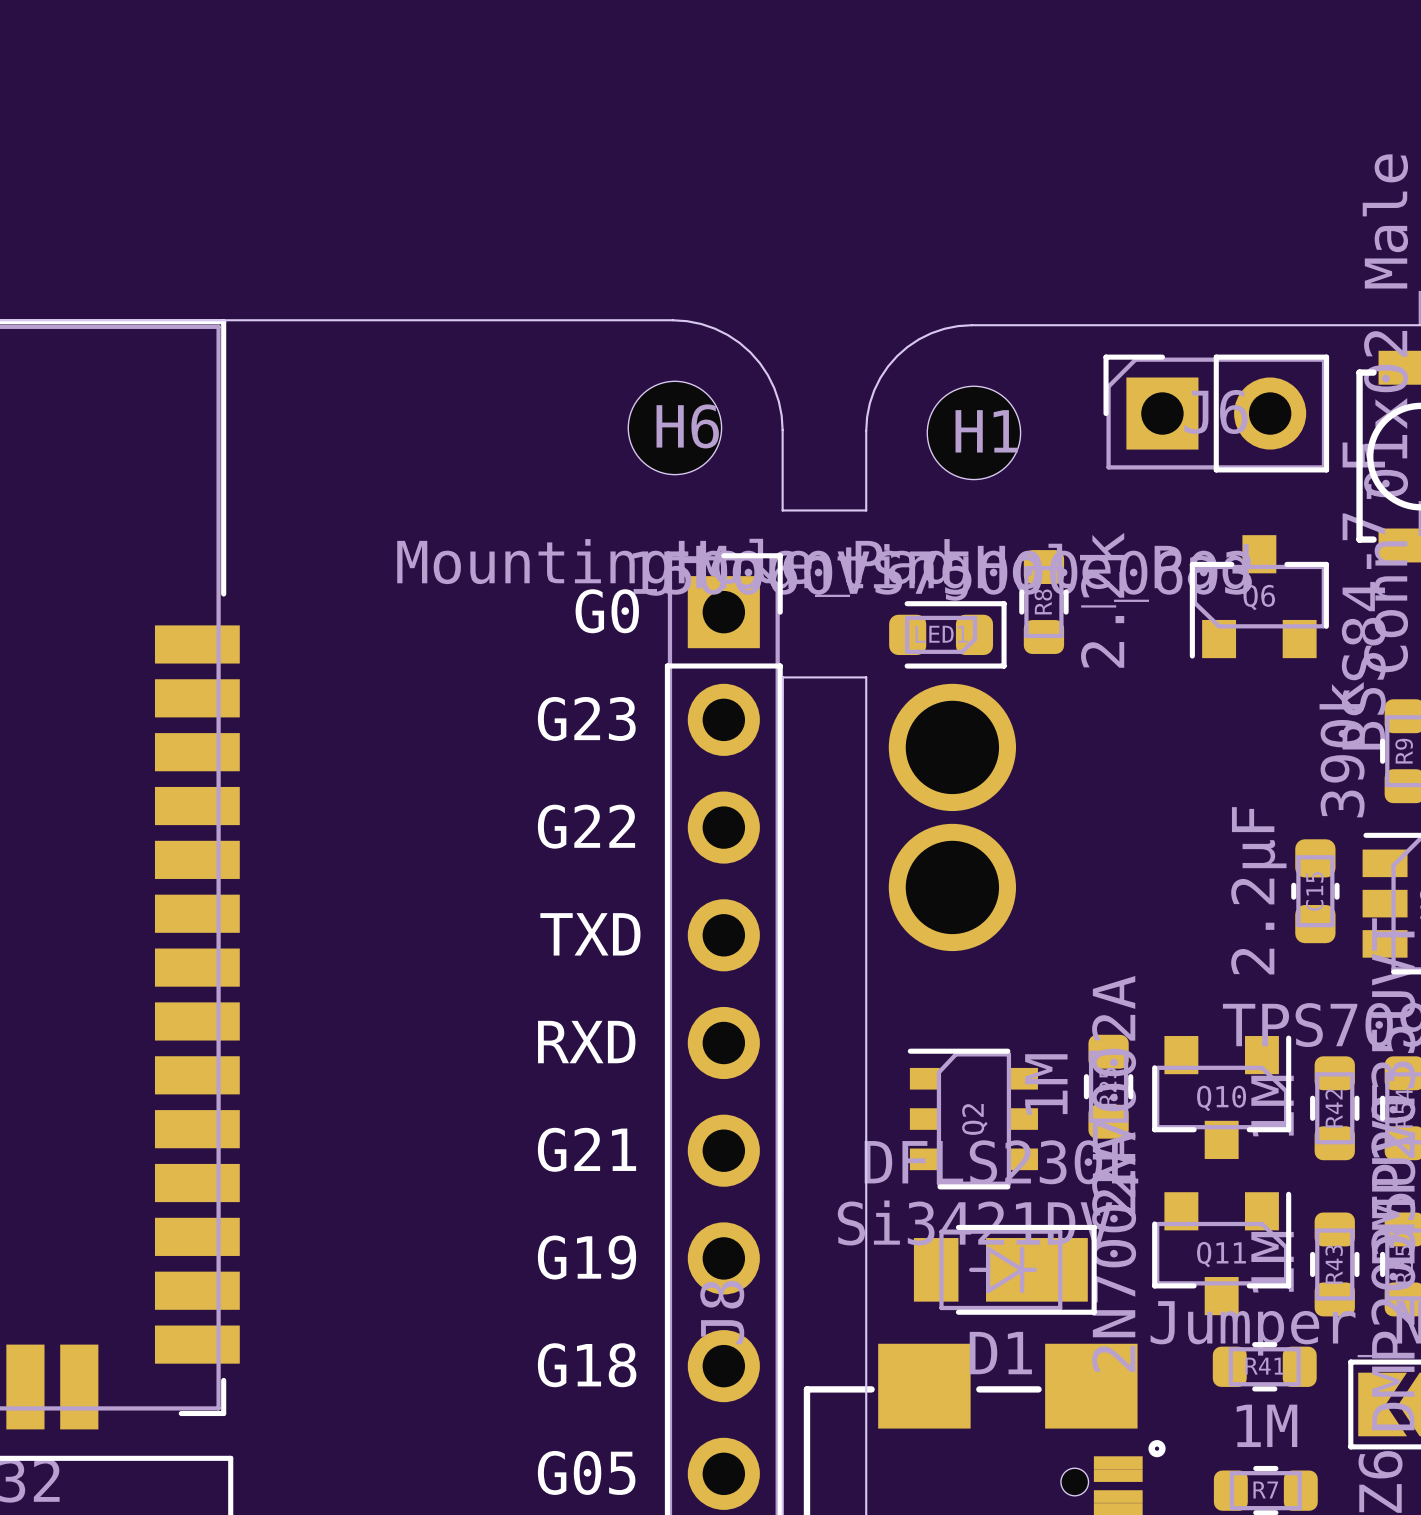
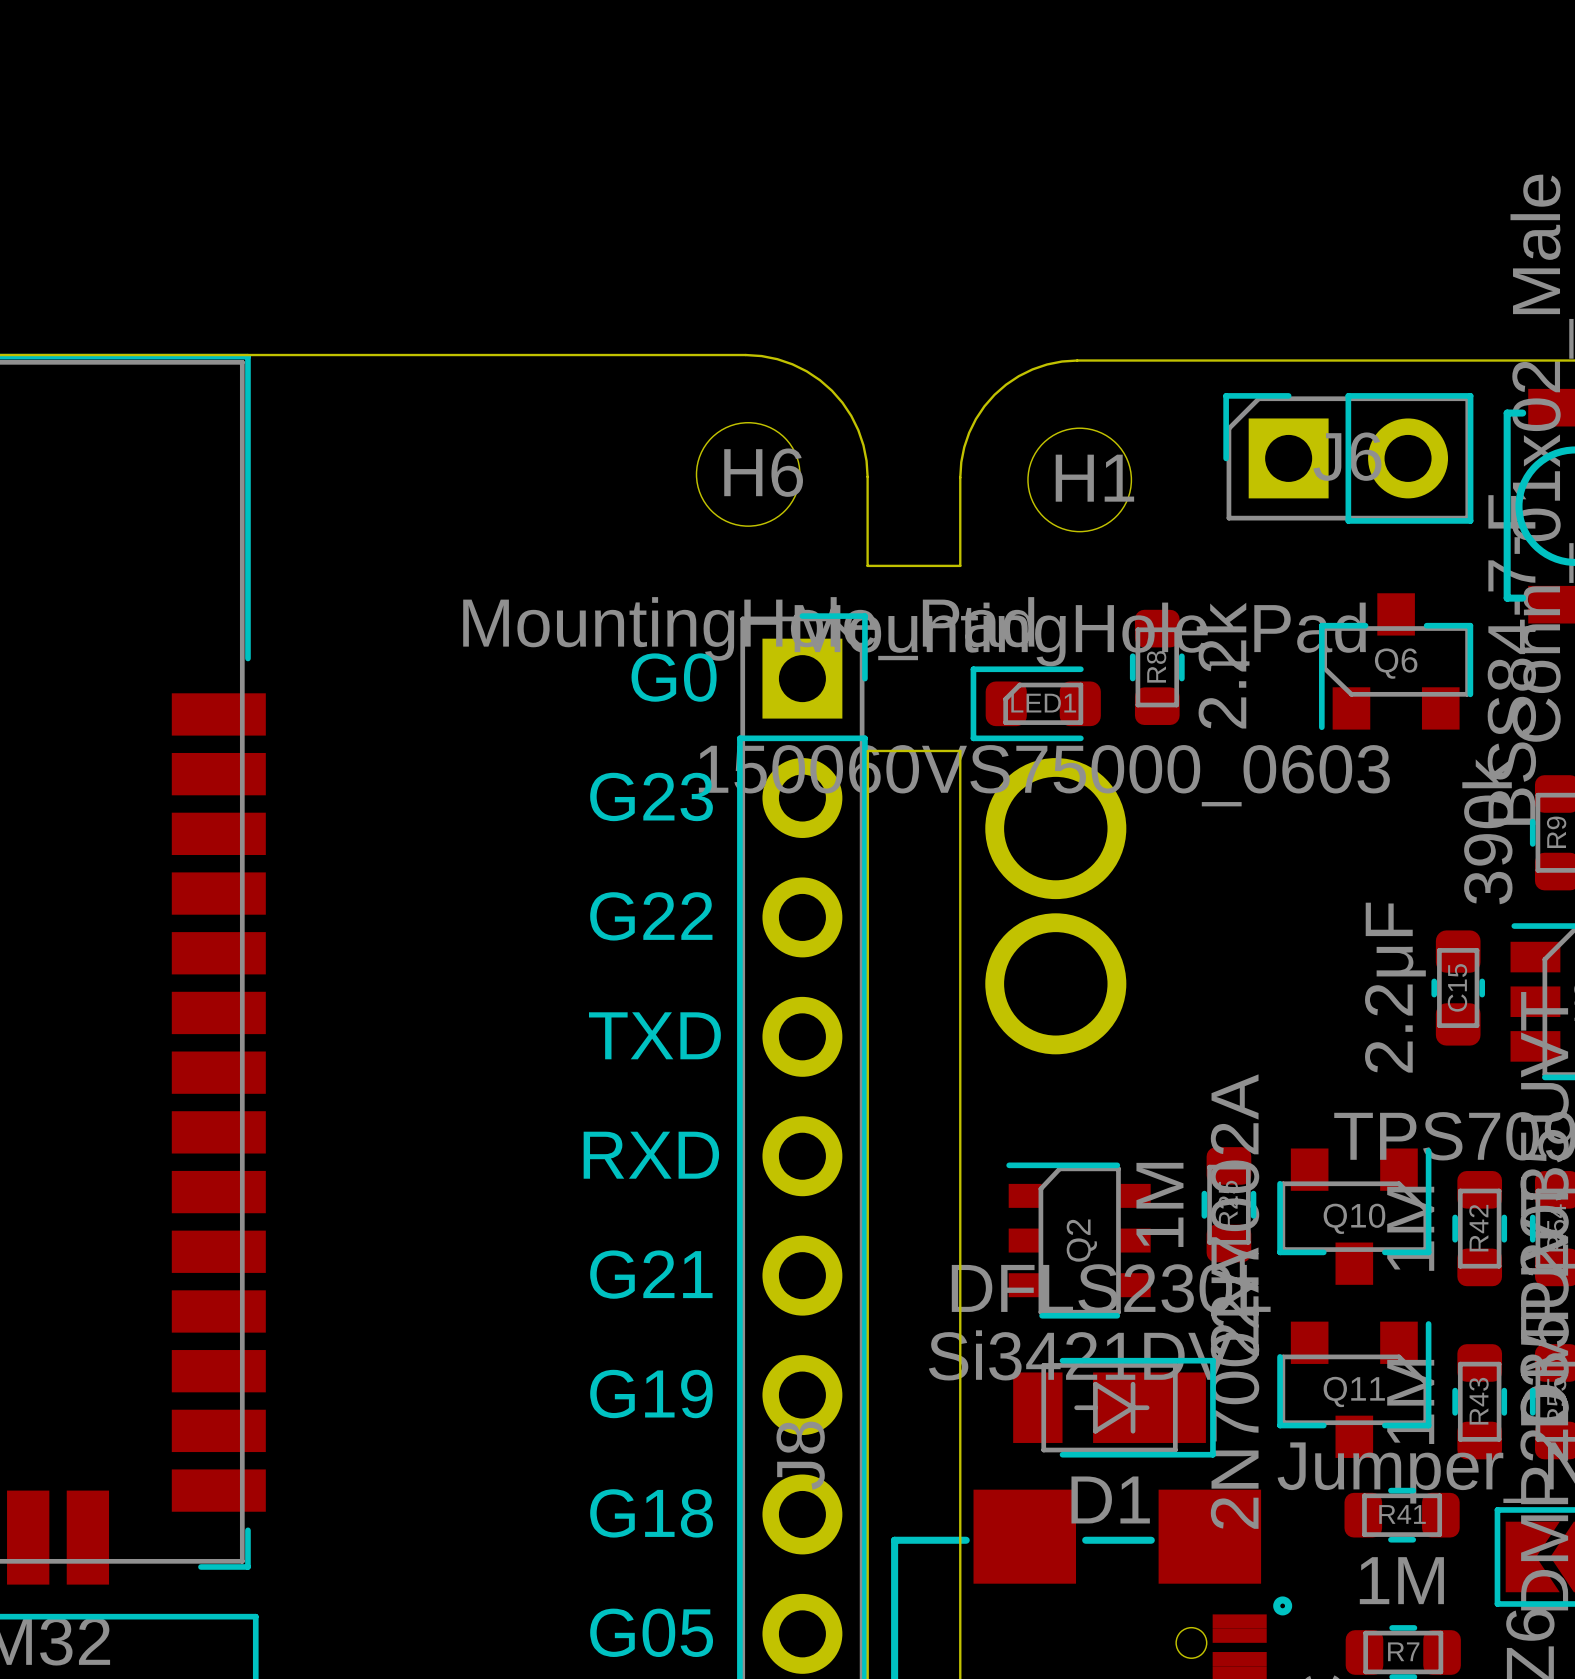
LED1 rotation: 0° (947, 634) -> 180° (1035, 703)

